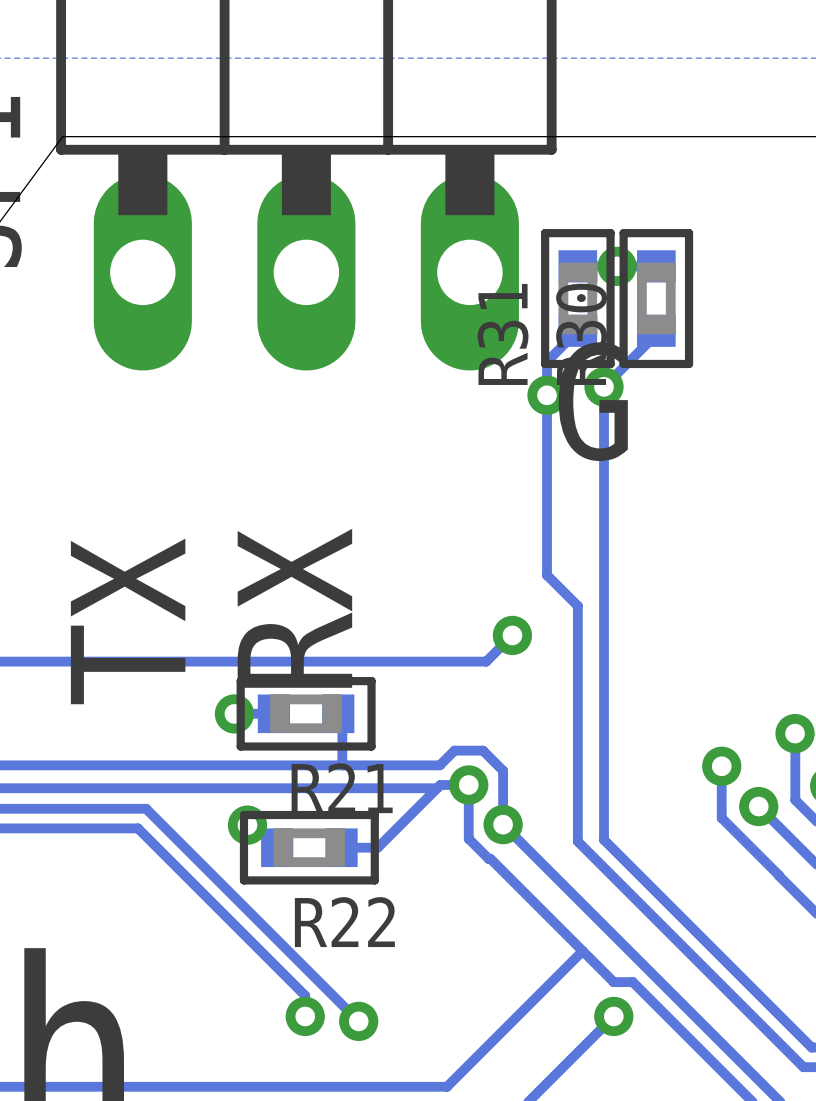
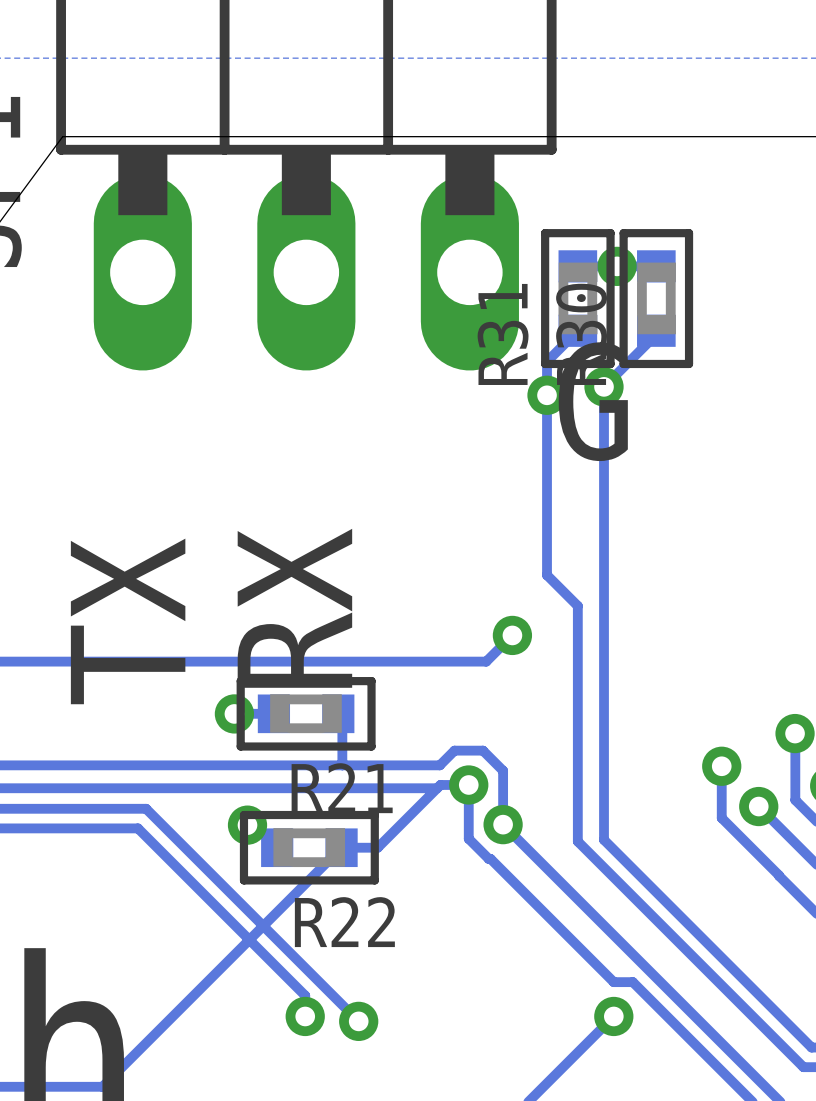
track: (582, 951) (447, 1086) (102, 1086) -> (341, 847) (102, 1086)

